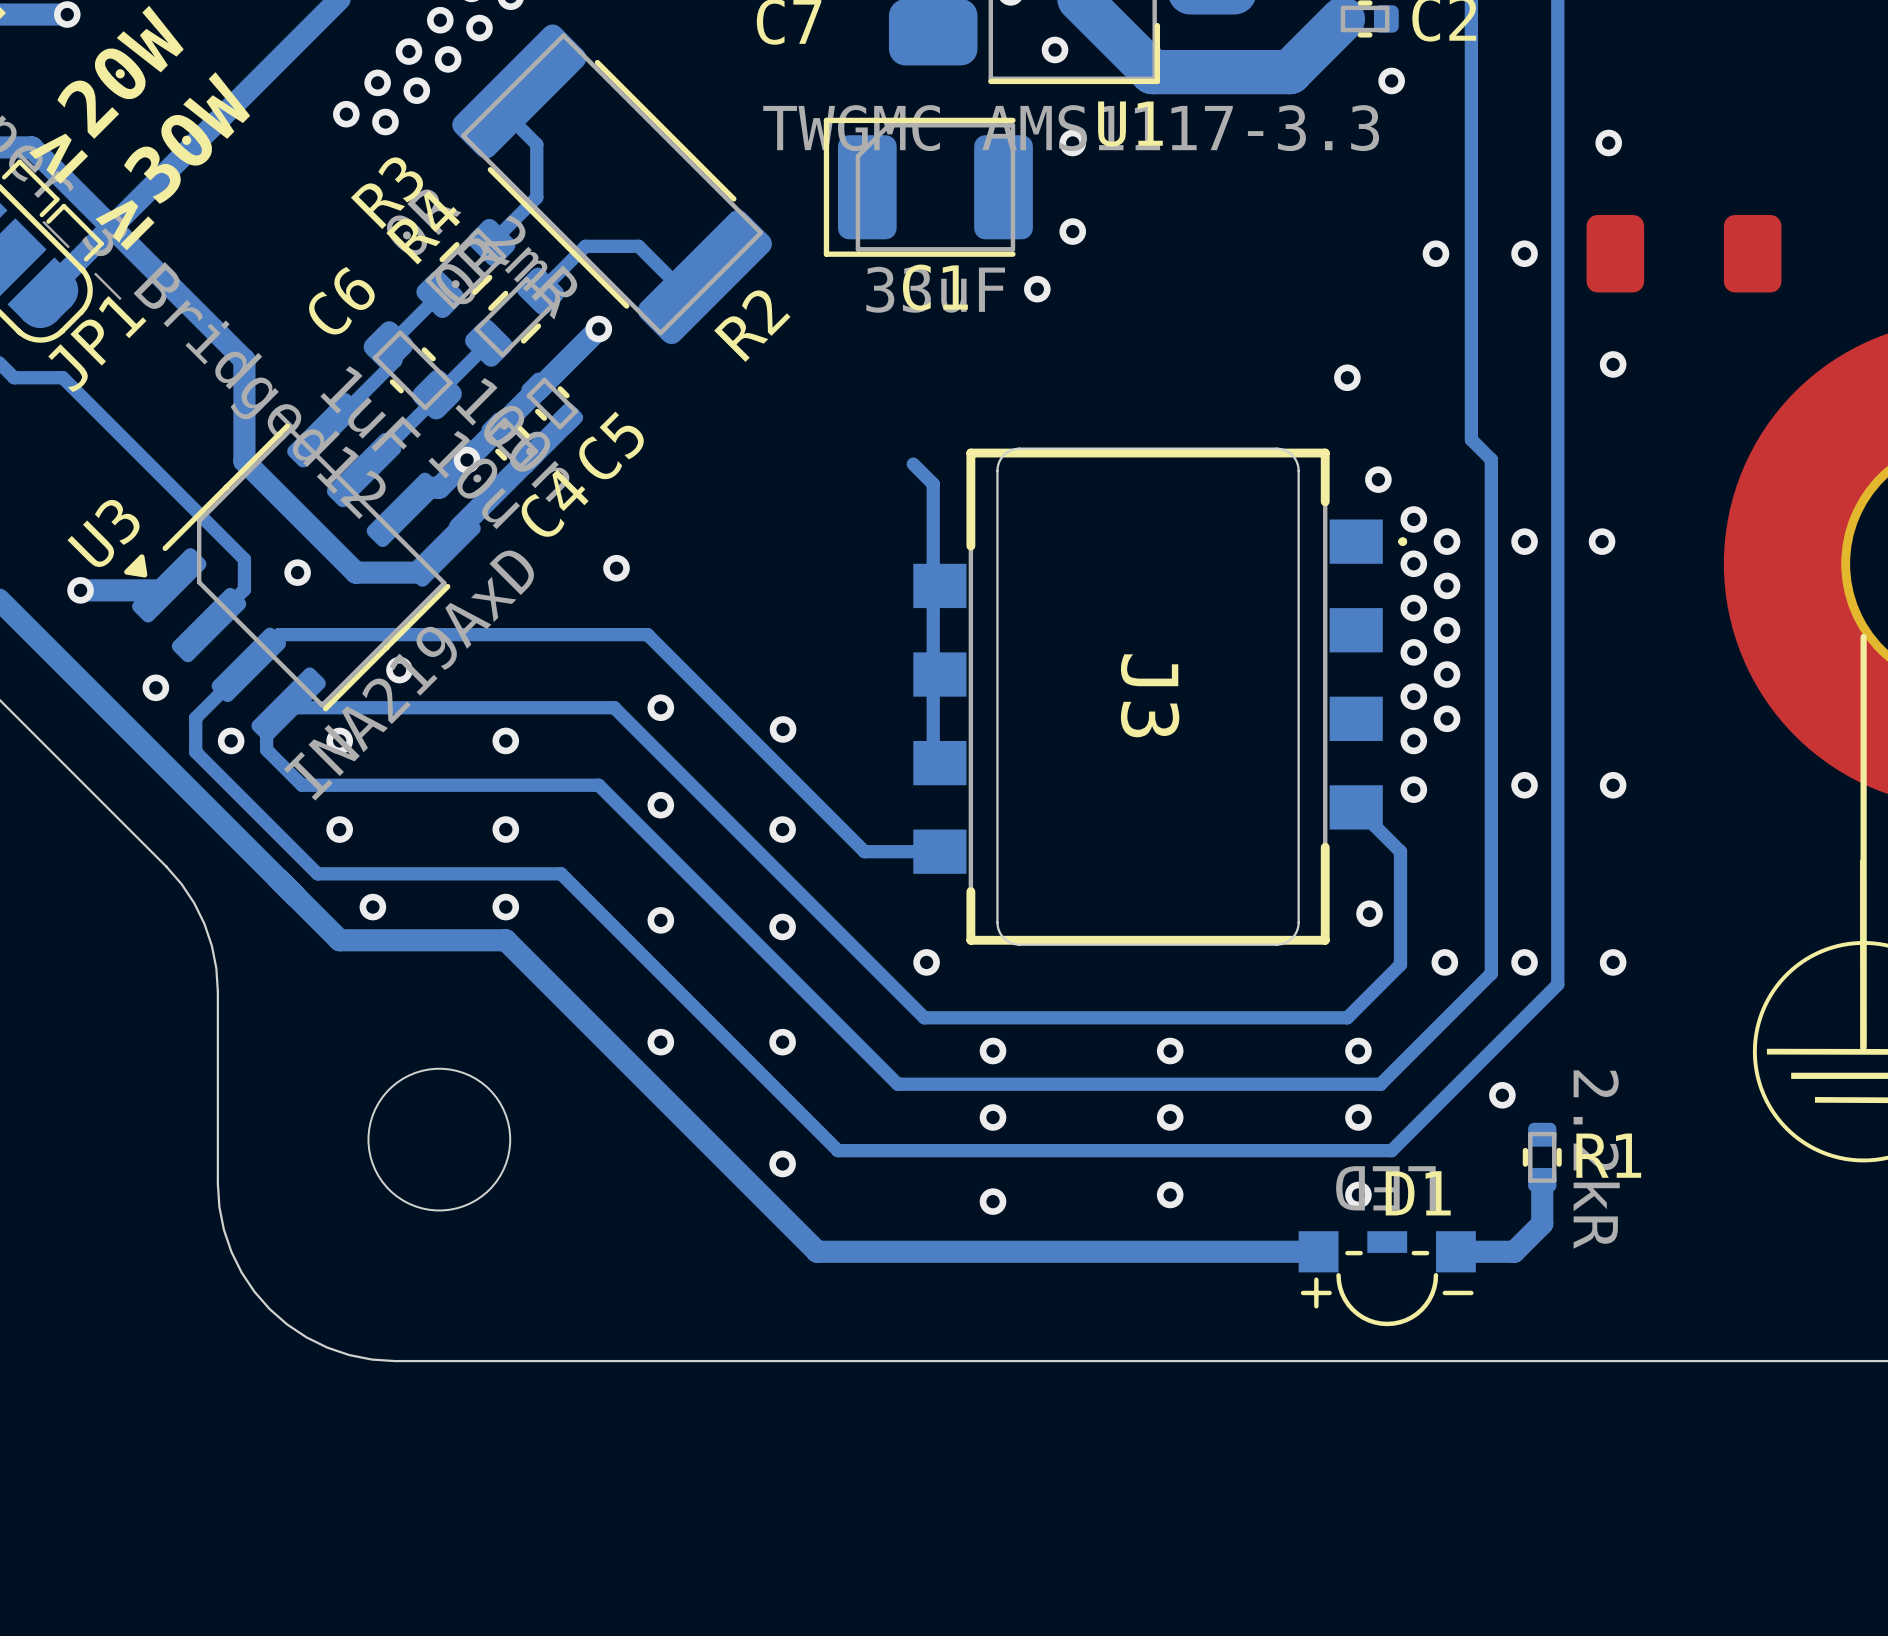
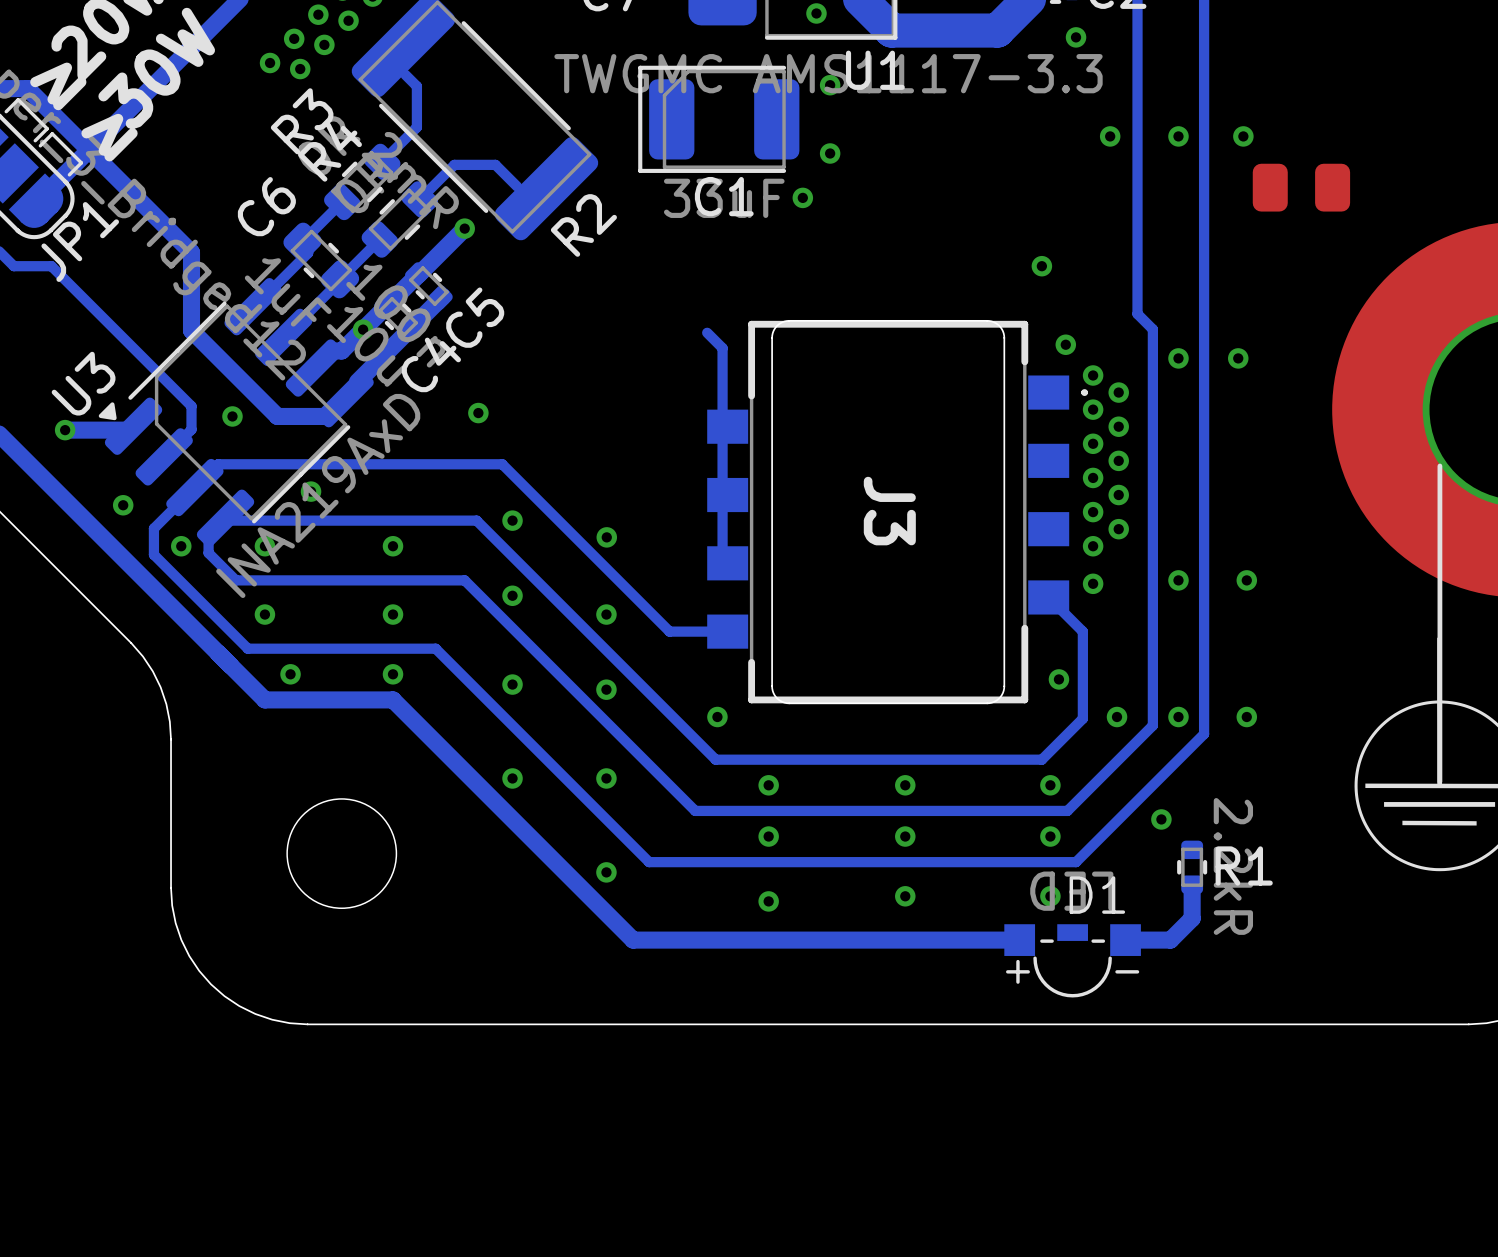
via: (1608, 142) -> none
via: none -> (1243, 136)
part footprint: [1586, 214, 1782, 293] -> [1252, 163, 1351, 212]
via position: (1435, 253) -> (1110, 136)
via position: (1524, 253) -> (1178, 136)
via: (1613, 364) -> none
via: none -> (1178, 358)
via: none -> (1238, 358)
via: (1524, 541) -> none
via: (1602, 541) -> none

